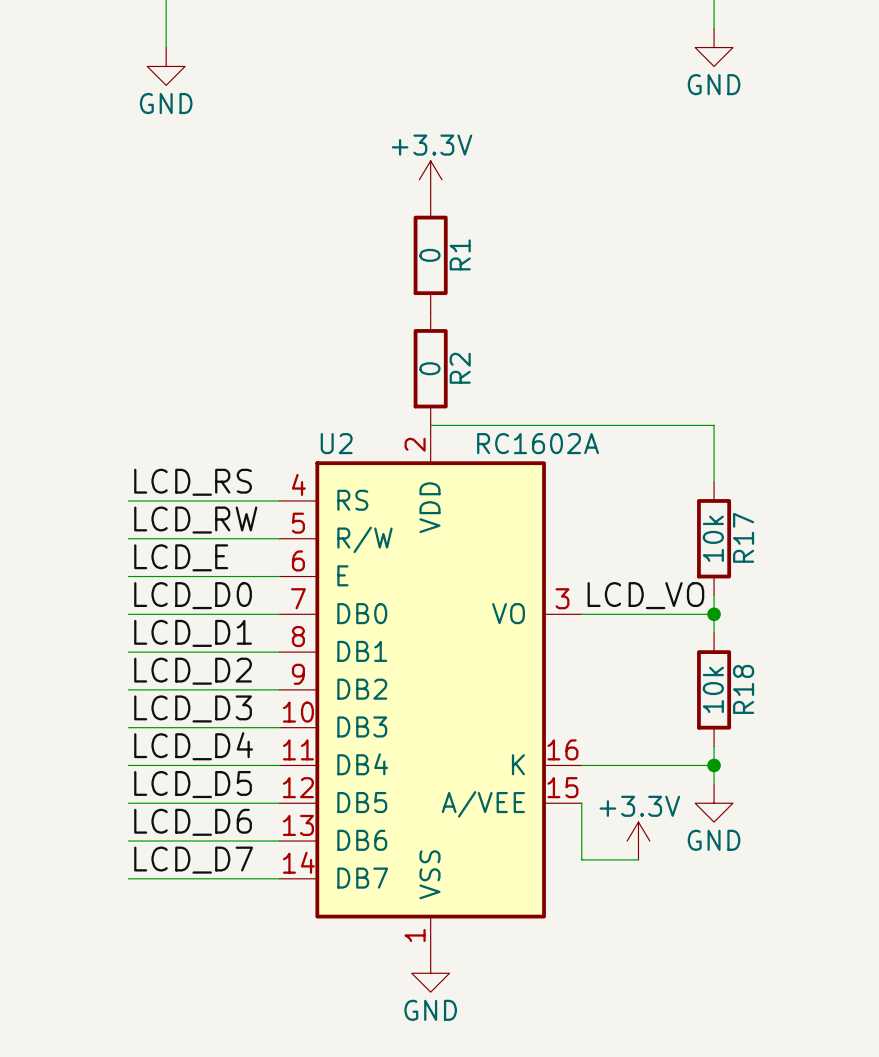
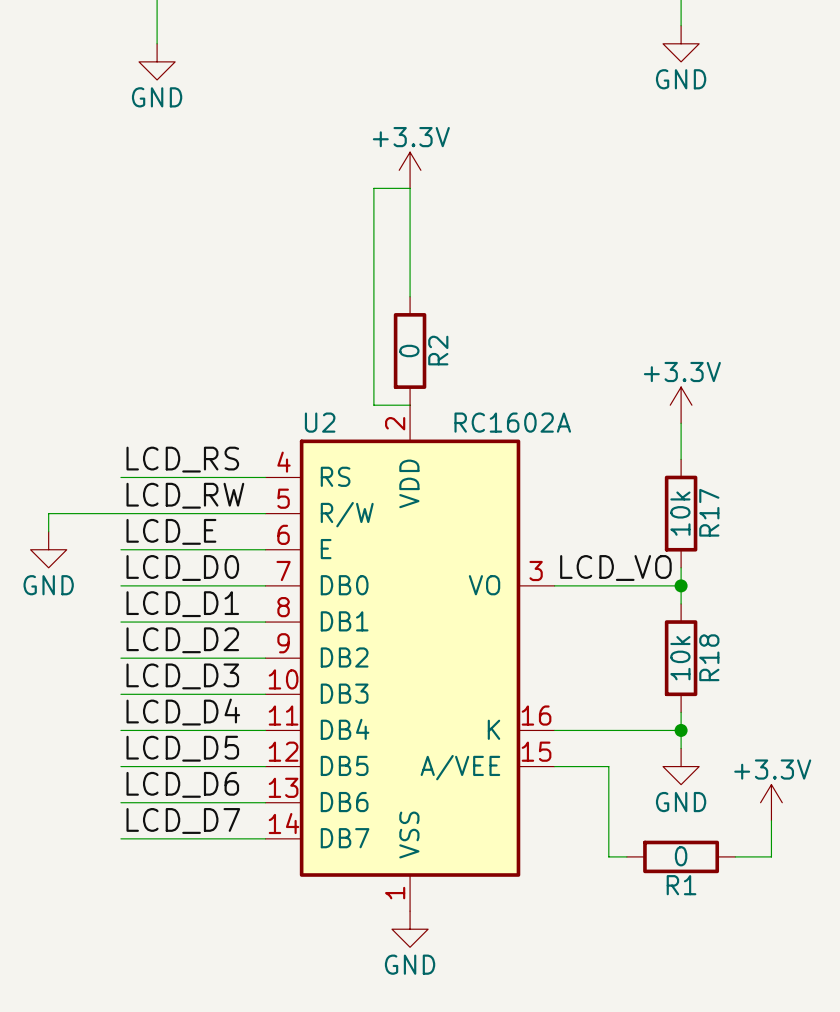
R1 rotation: 0° (430, 255) -> 90° clockwise (681, 856)
R1 position: (430, 255) -> (681, 856)
wire: (430, 425) (714, 425) (714, 444) -> (410, 405) (373, 405) (373, 188) (410, 188) (410, 296)
power symbol: none -> +3.3V (681, 405)
wire: none -> (120, 513) (48, 513) (48, 531)
power symbol: none -> GND (48, 549)
wire: (581, 803) (581, 859) (638, 859) -> (554, 766) (608, 766) (608, 856) (626, 856)
power symbol position: +3.3V (638, 841) -> +3.3V (771, 802)
wire: none -> (771, 820) (771, 856) (735, 856)

